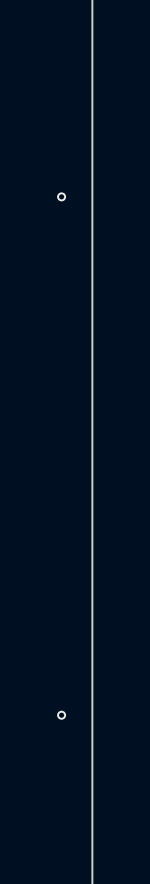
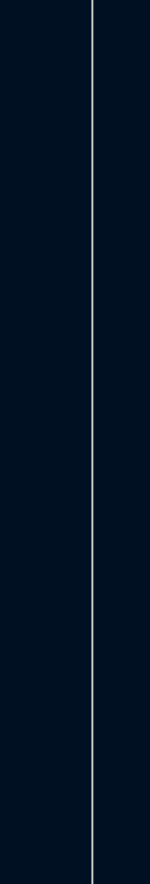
via: (61, 196) -> none
via: (61, 715) -> none

